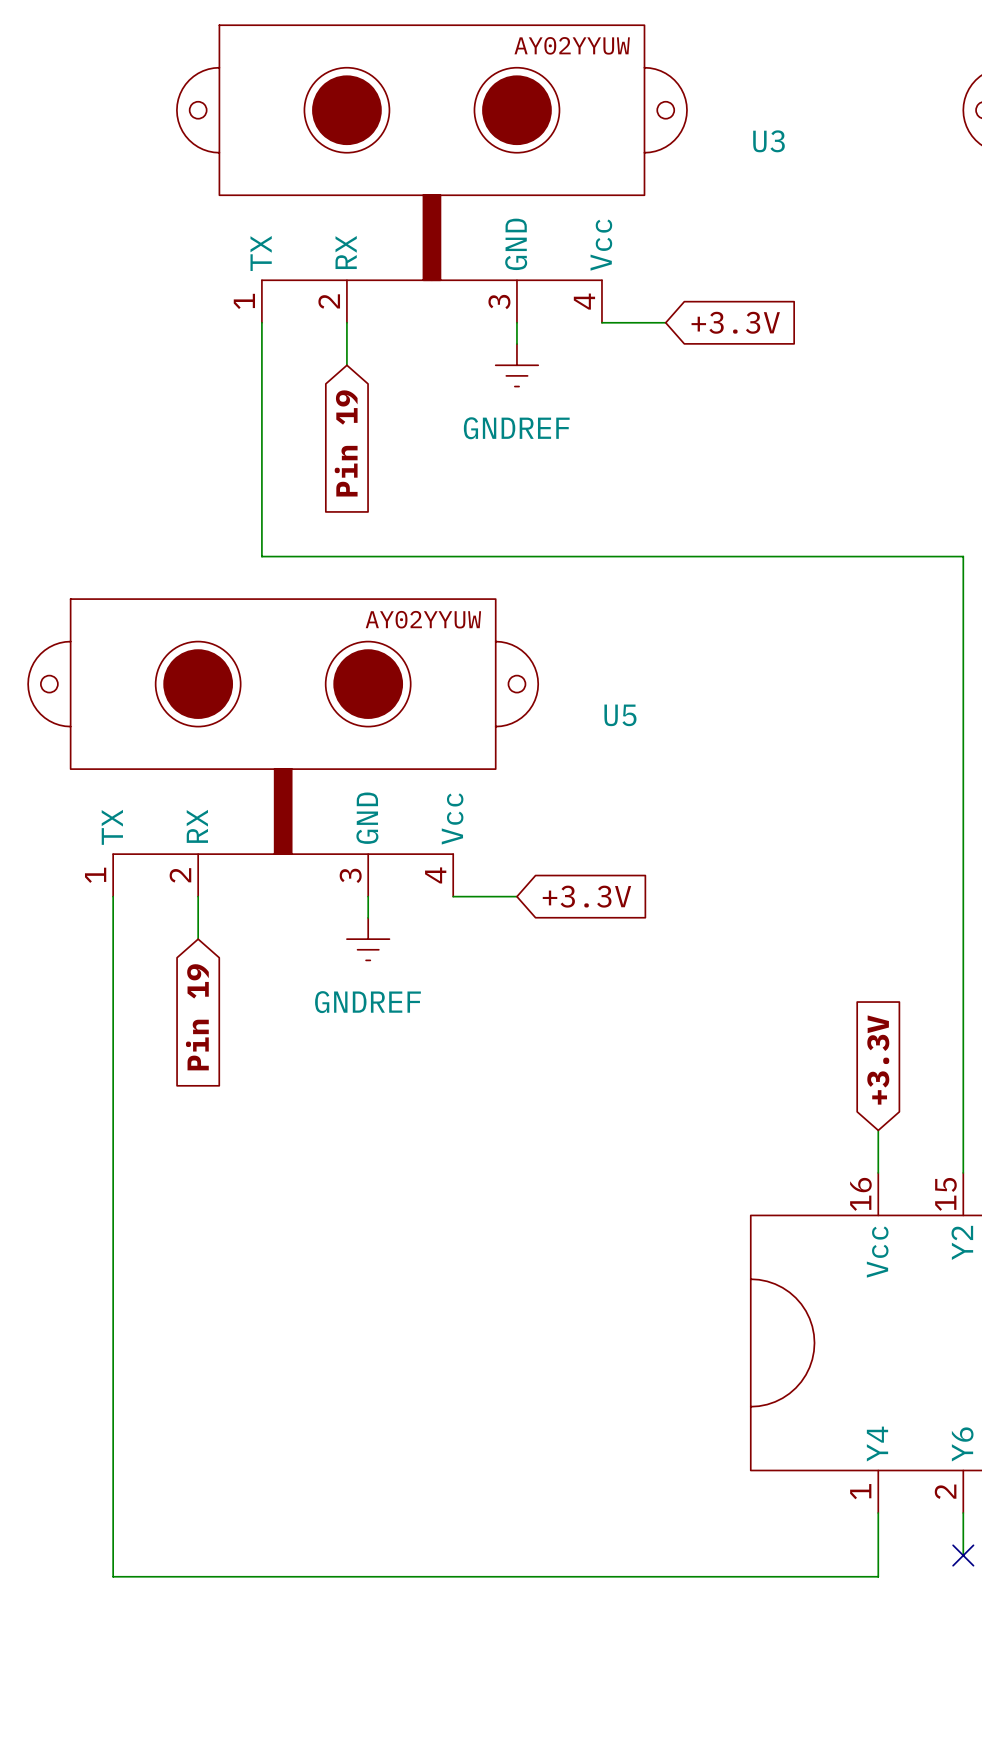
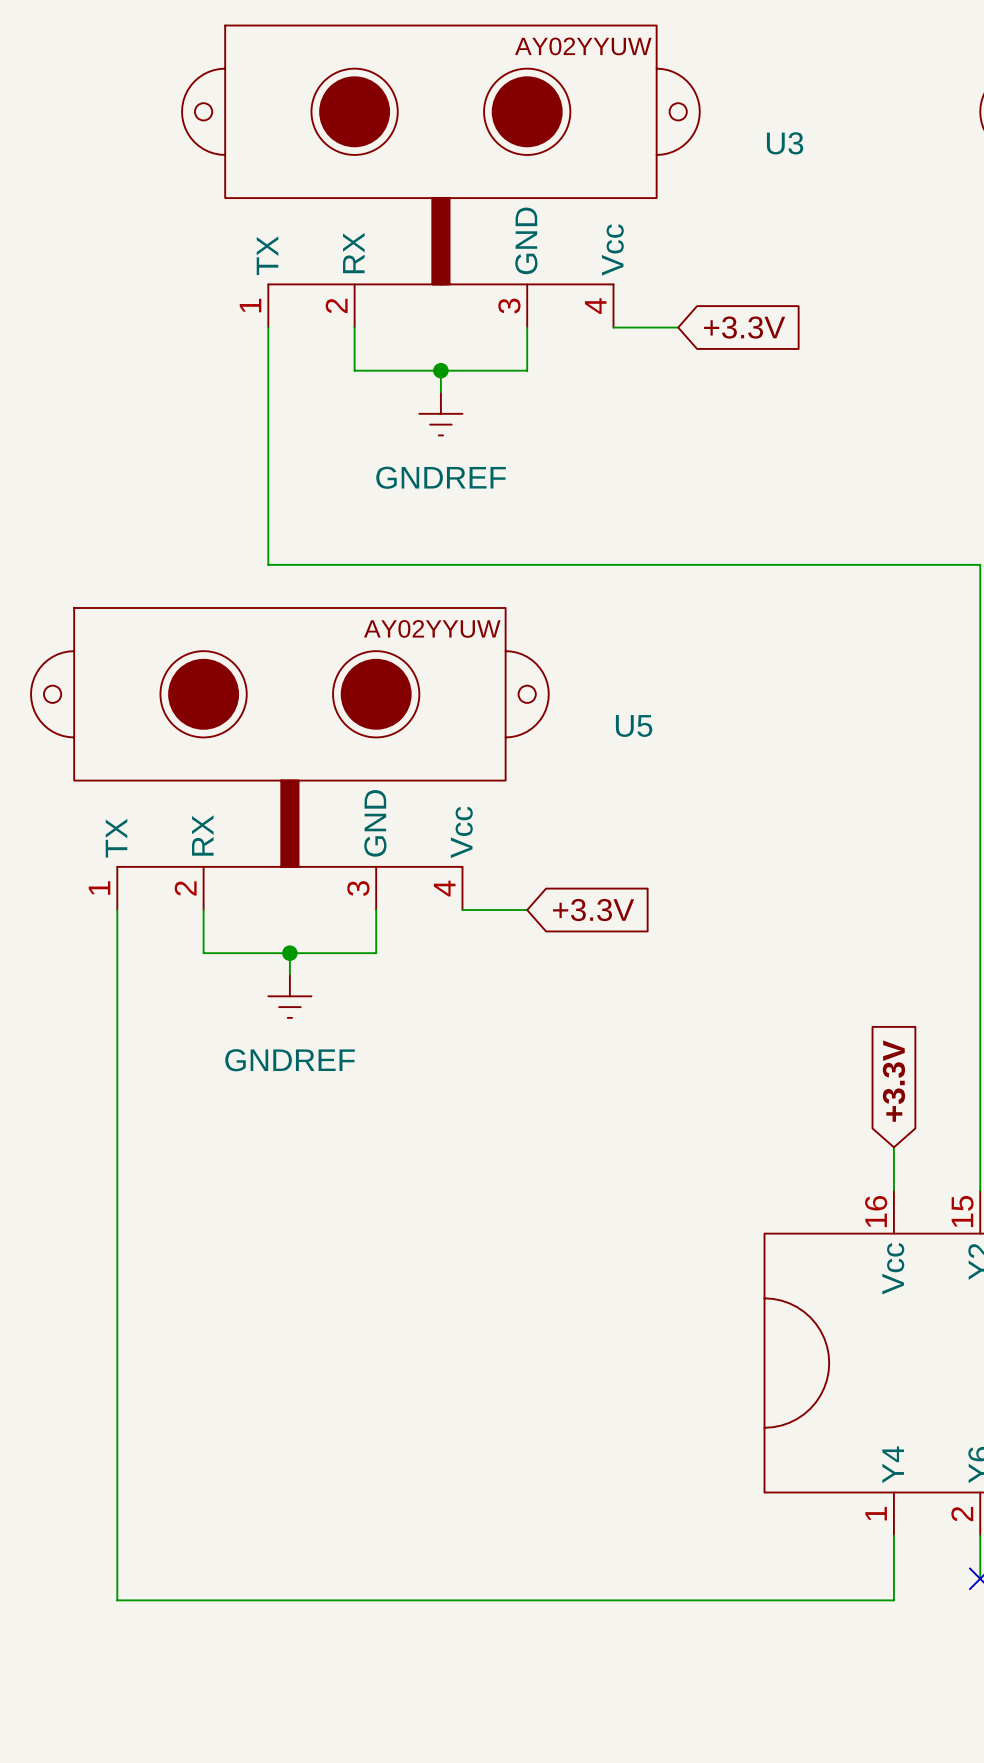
wire: none -> (527, 349) (527, 370) (354, 370)
wire: none -> (440, 370) (440, 392)
junction: none -> (440, 370)
power symbol position: GNDREF (516, 365) -> GNDREF (440, 413)
global label: Pin 19 (346, 443) -> none
wire: none -> (376, 931) (376, 953) (203, 953)
wire: none -> (289, 953) (289, 974)
junction: none -> (289, 953)
power symbol position: GNDREF (368, 939) -> GNDREF (289, 996)
global label: Pin 19 (197, 1017) -> none

